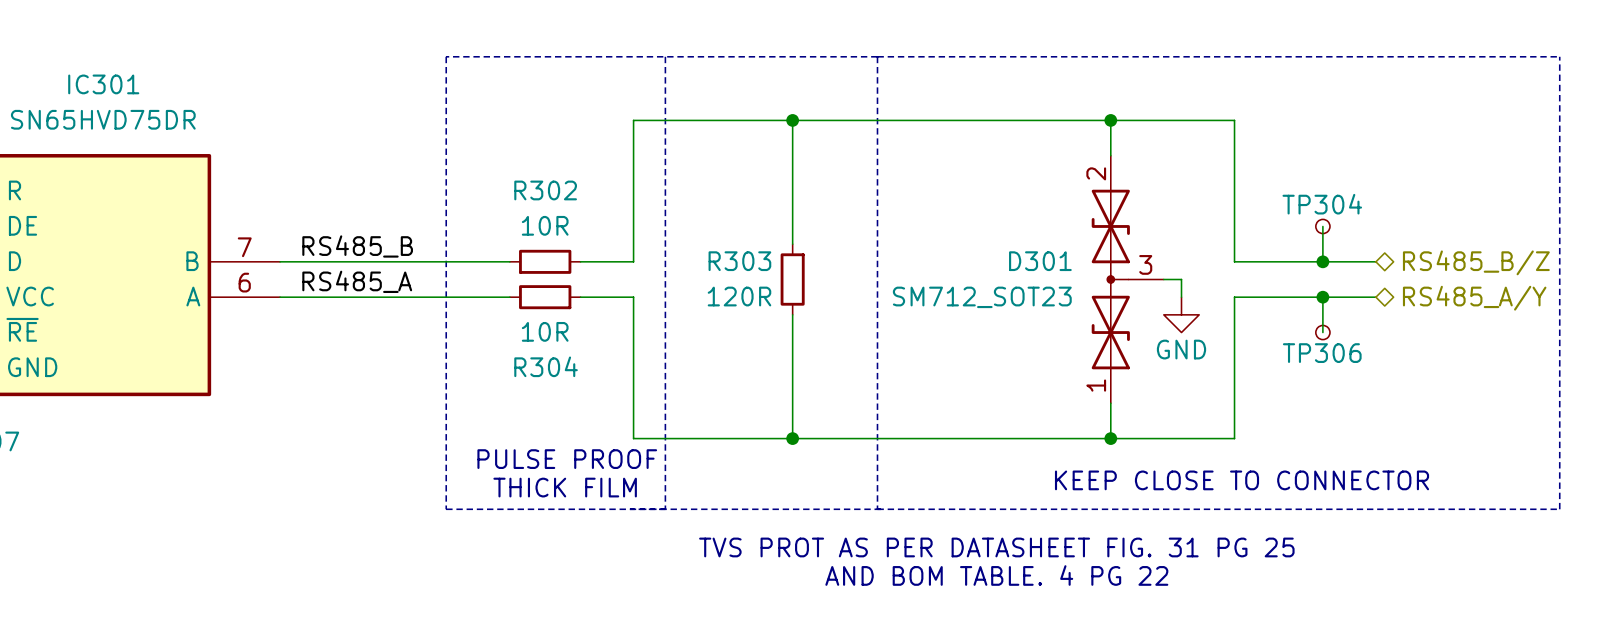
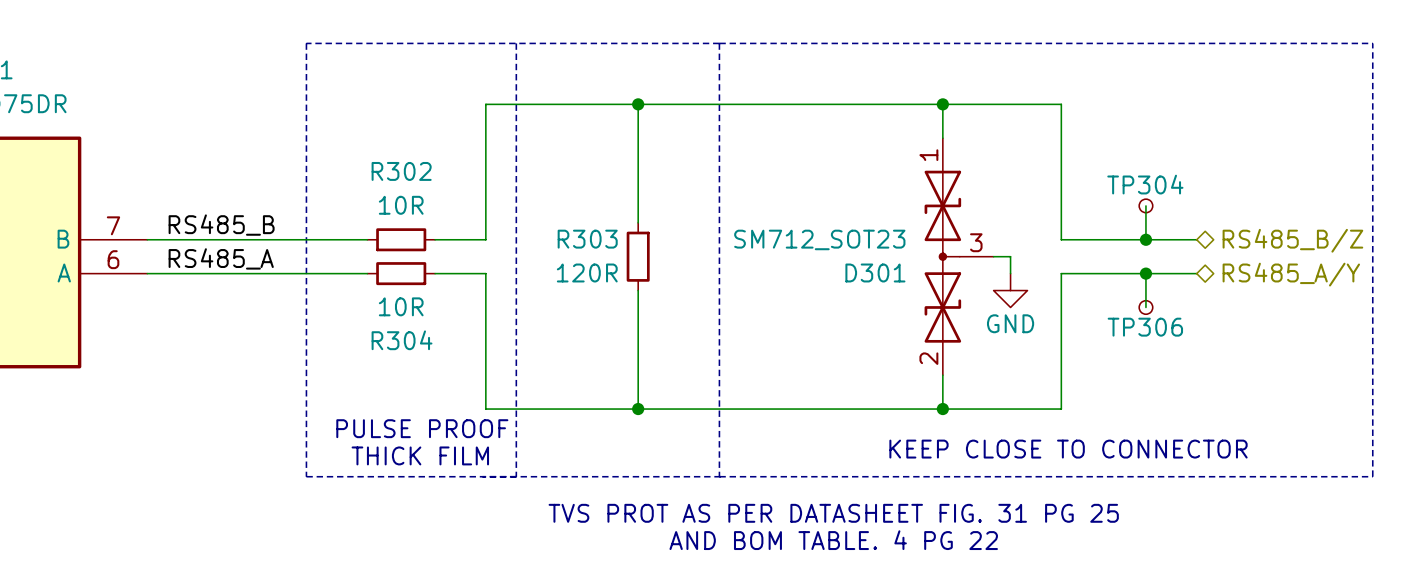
D301 flip: as is (1110, 279) -> up-down (942, 256)

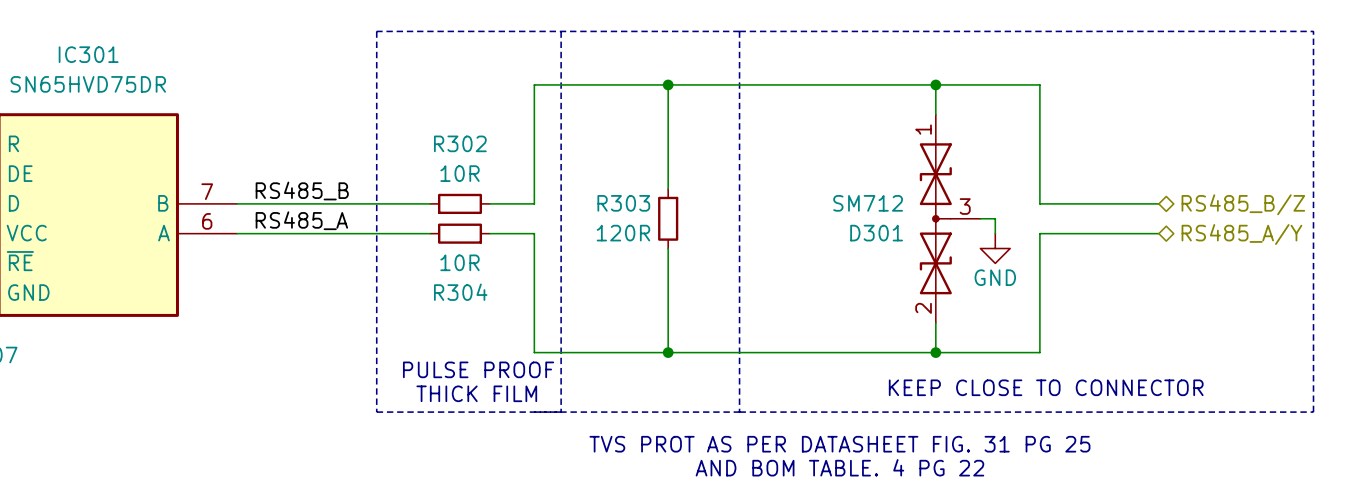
wire: (1145, 205) (1145, 239) -> none
TP304: (1145, 205) -> none
D301 value: SM712_SOT23 (819, 239) -> SM712 (868, 203)
junction: (1145, 239) -> none
wire: (1145, 273) (1145, 307) -> none
junction: (1145, 273) -> none
TP306: (1145, 307) -> none

